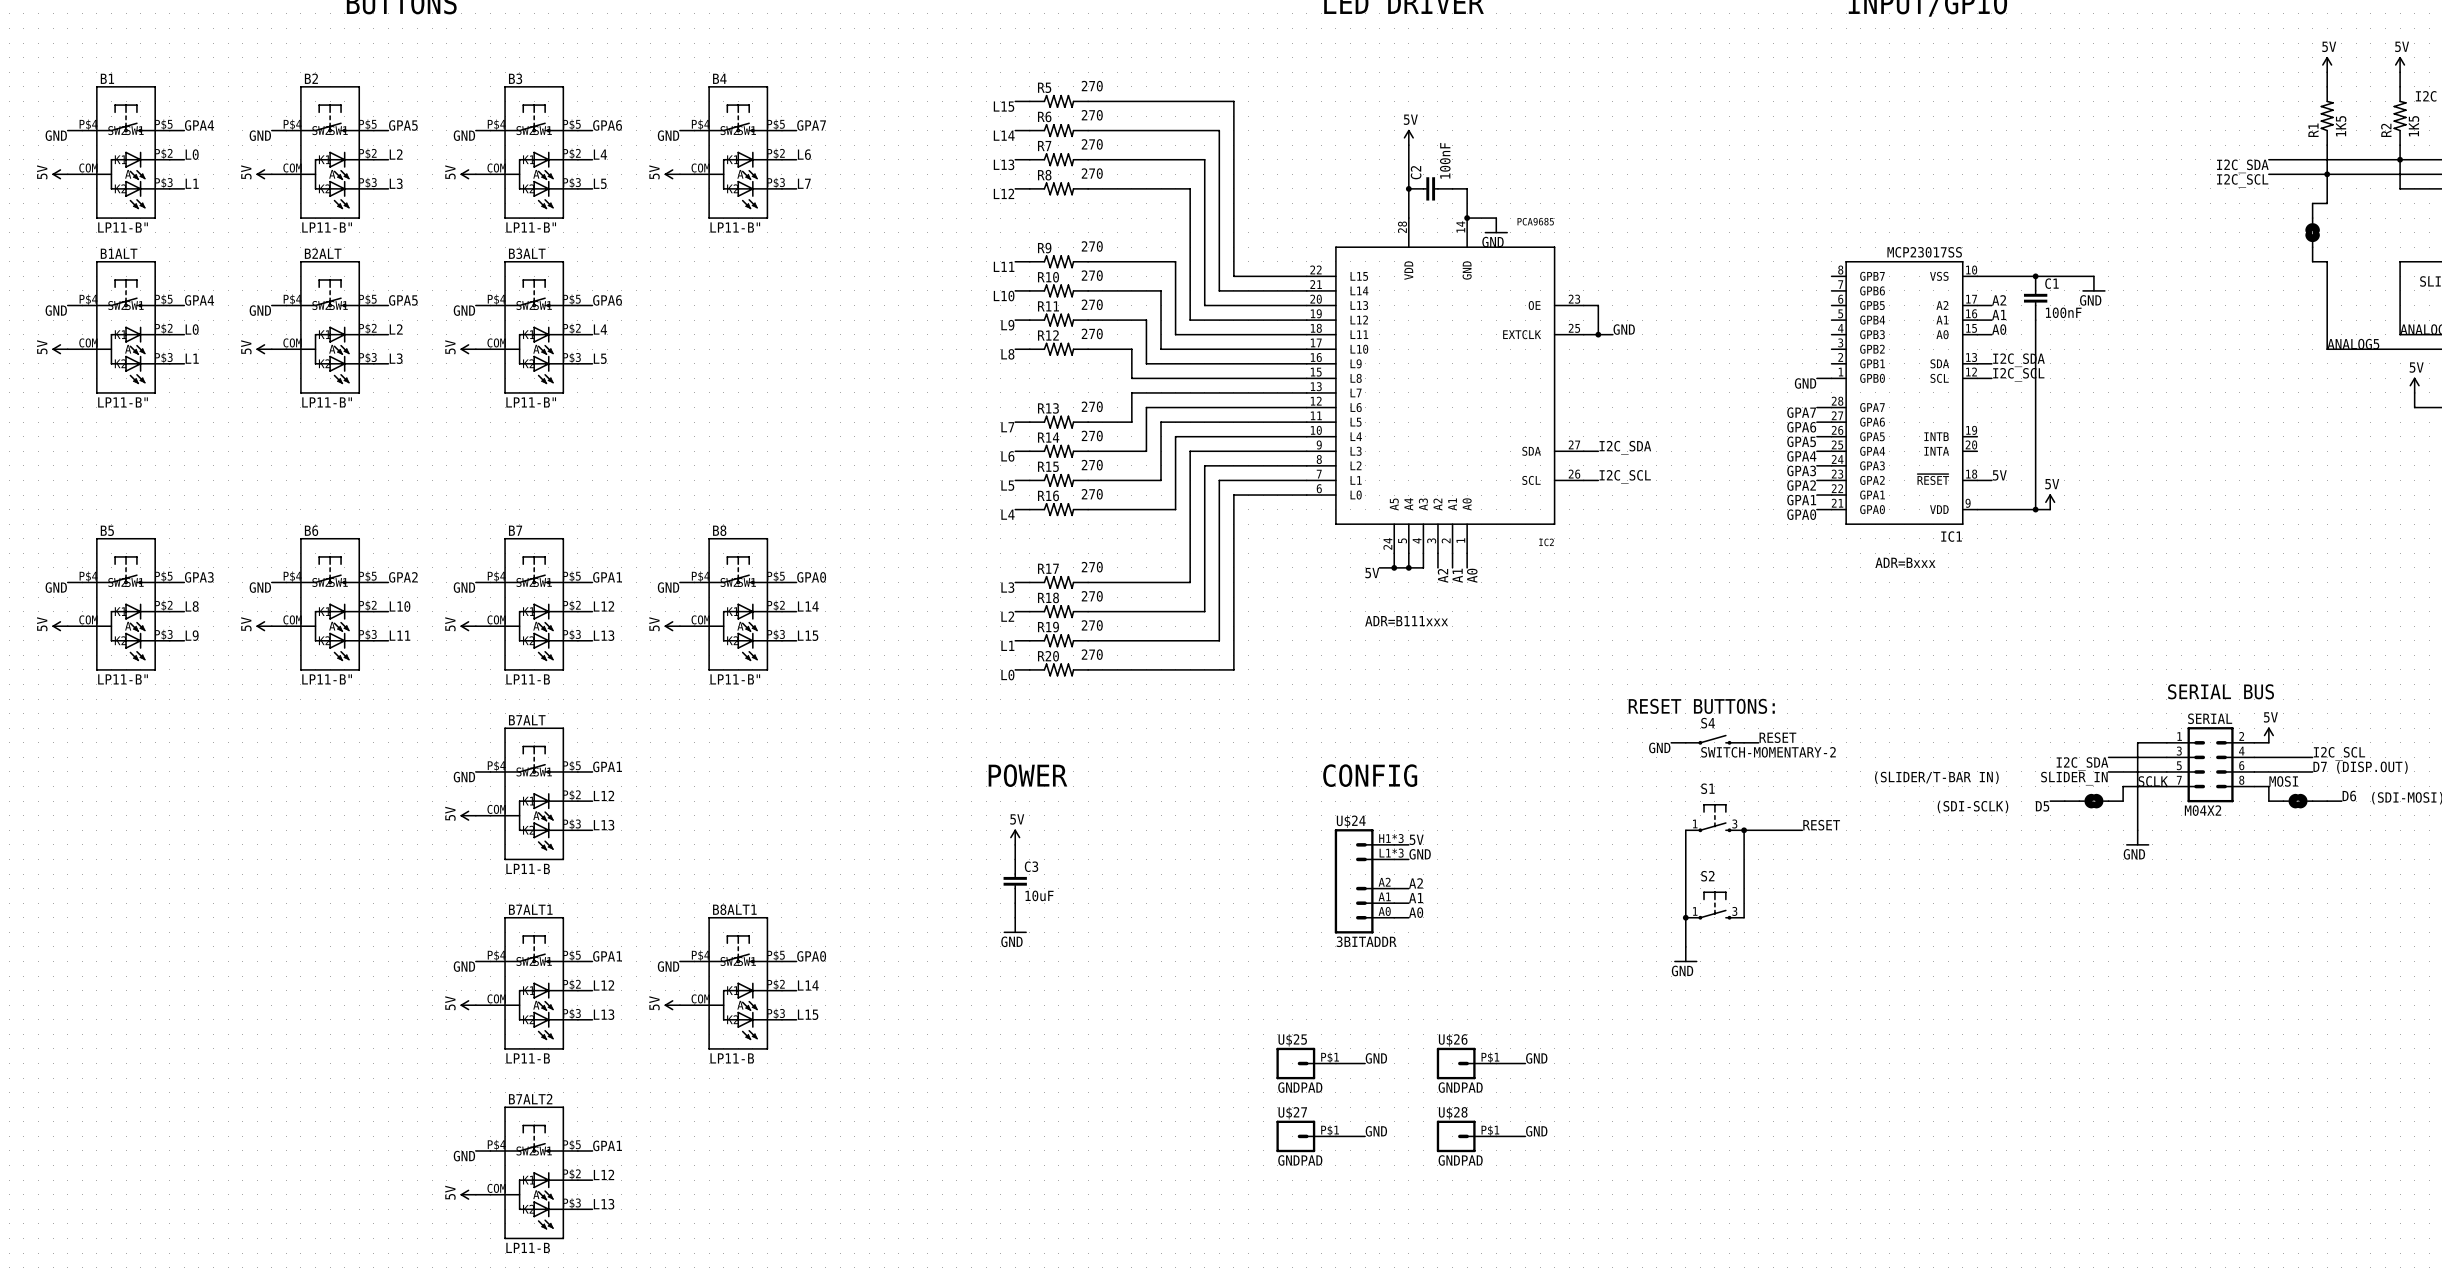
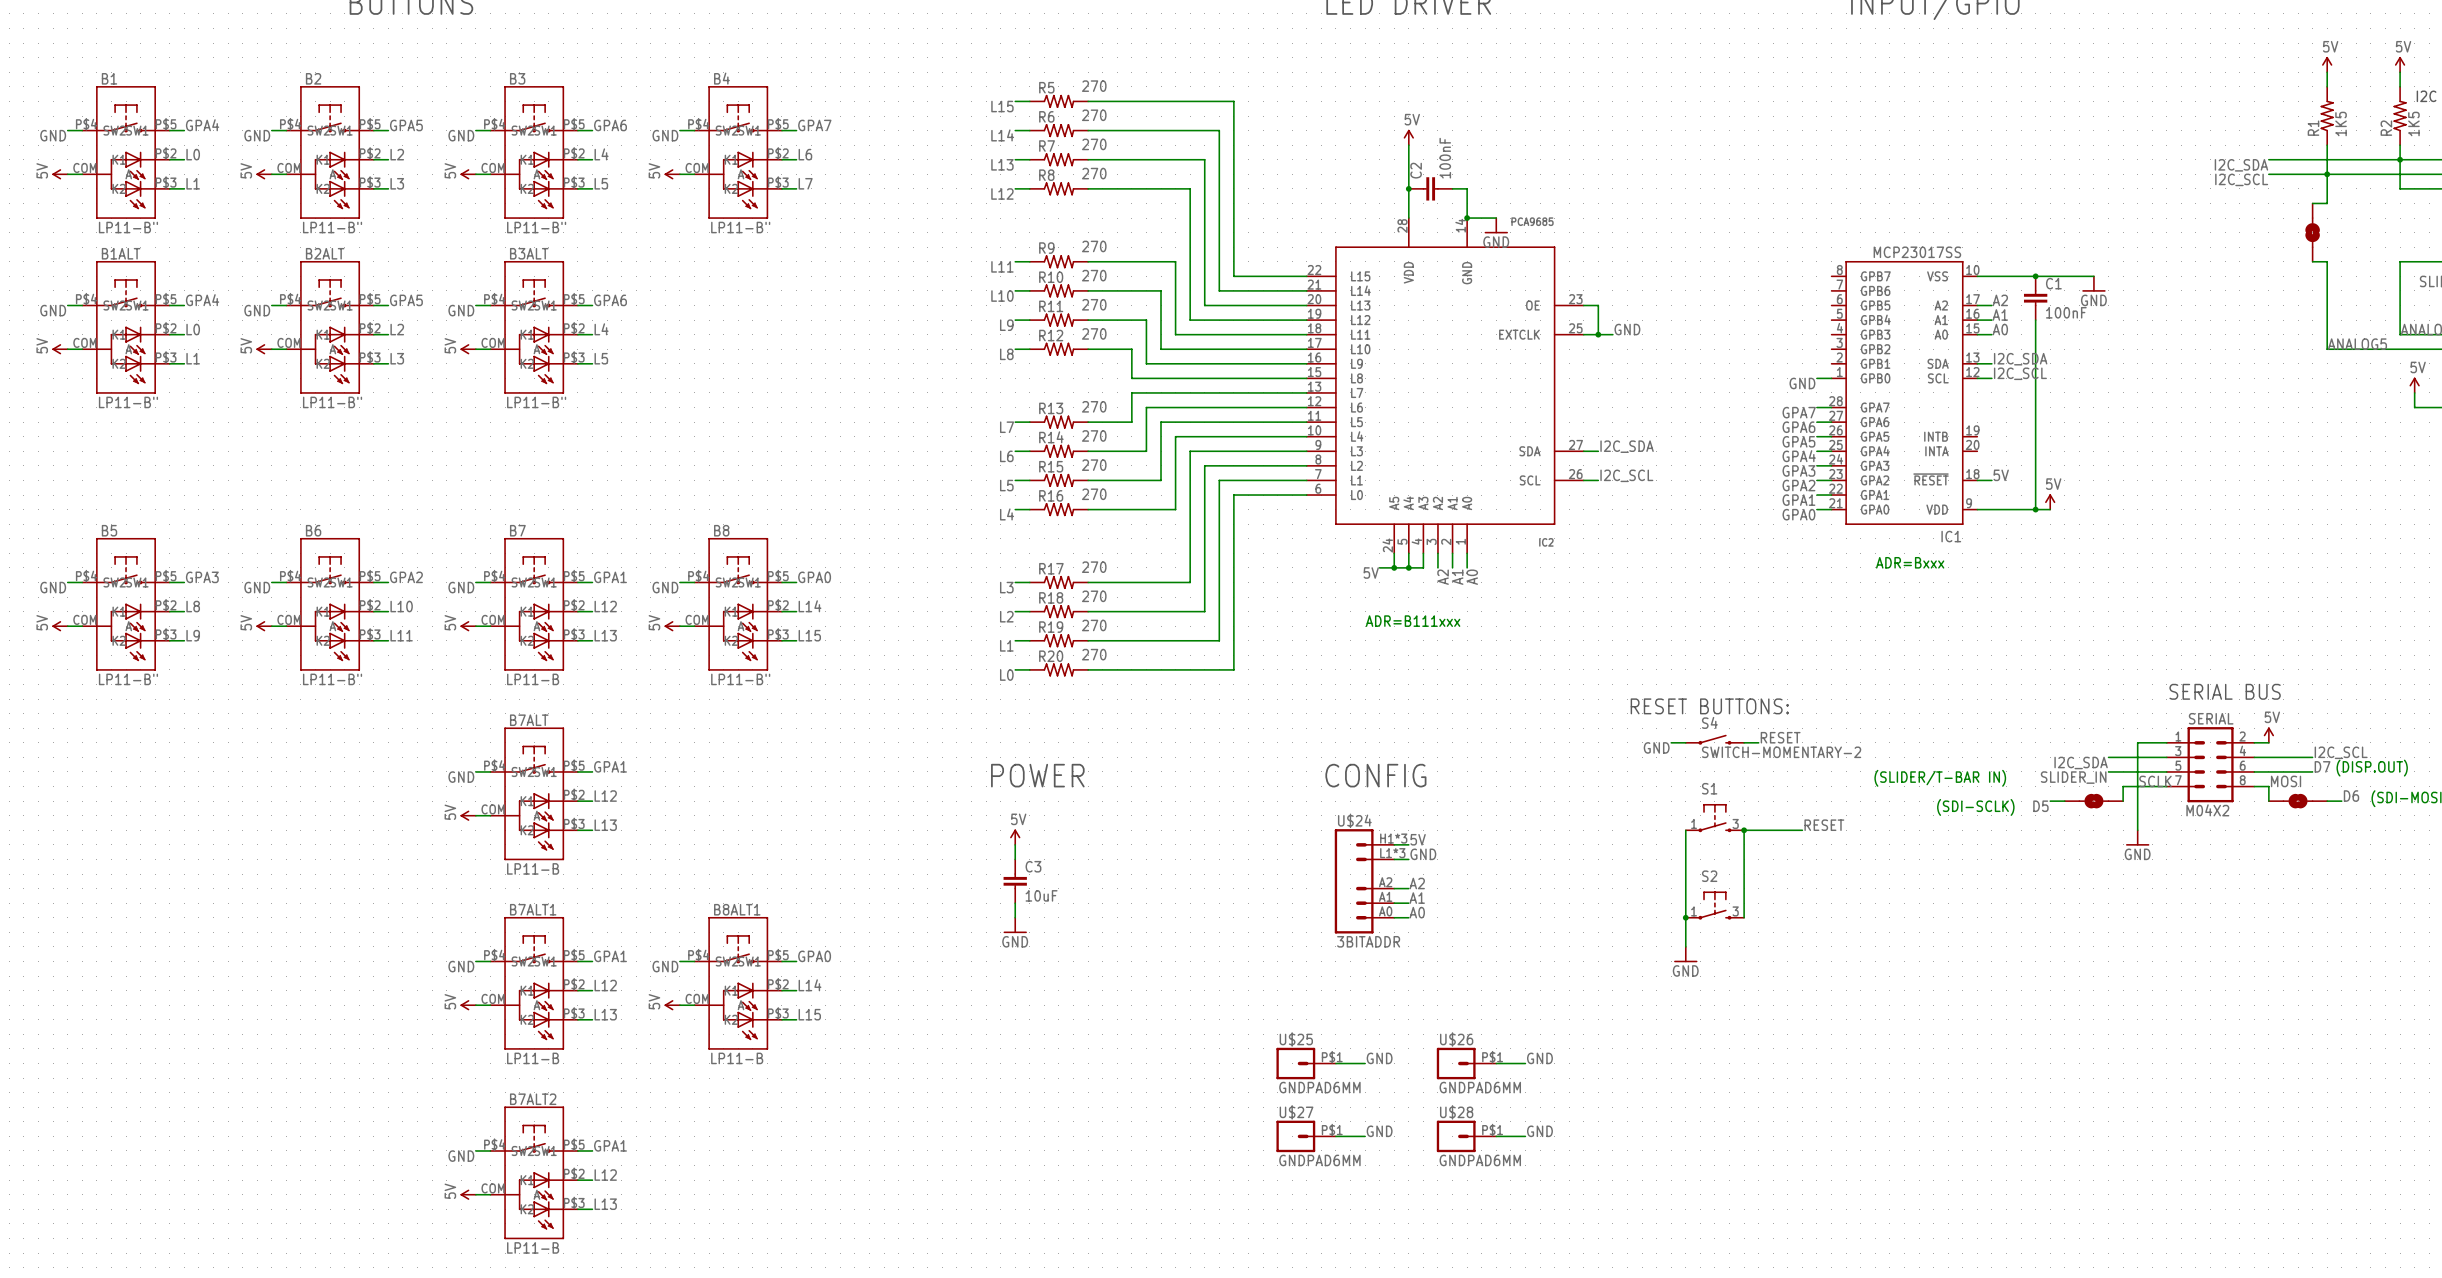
U$25 value: GNDPAD (1300, 1087) -> GNDPAD6MM (1319, 1087)
U$26 value: GNDPAD (1460, 1087) -> GNDPAD6MM (1480, 1087)
U$27 value: GNDPAD (1300, 1160) -> GNDPAD6MM (1319, 1160)
U$28 value: GNDPAD (1460, 1160) -> GNDPAD6MM (1480, 1160)

